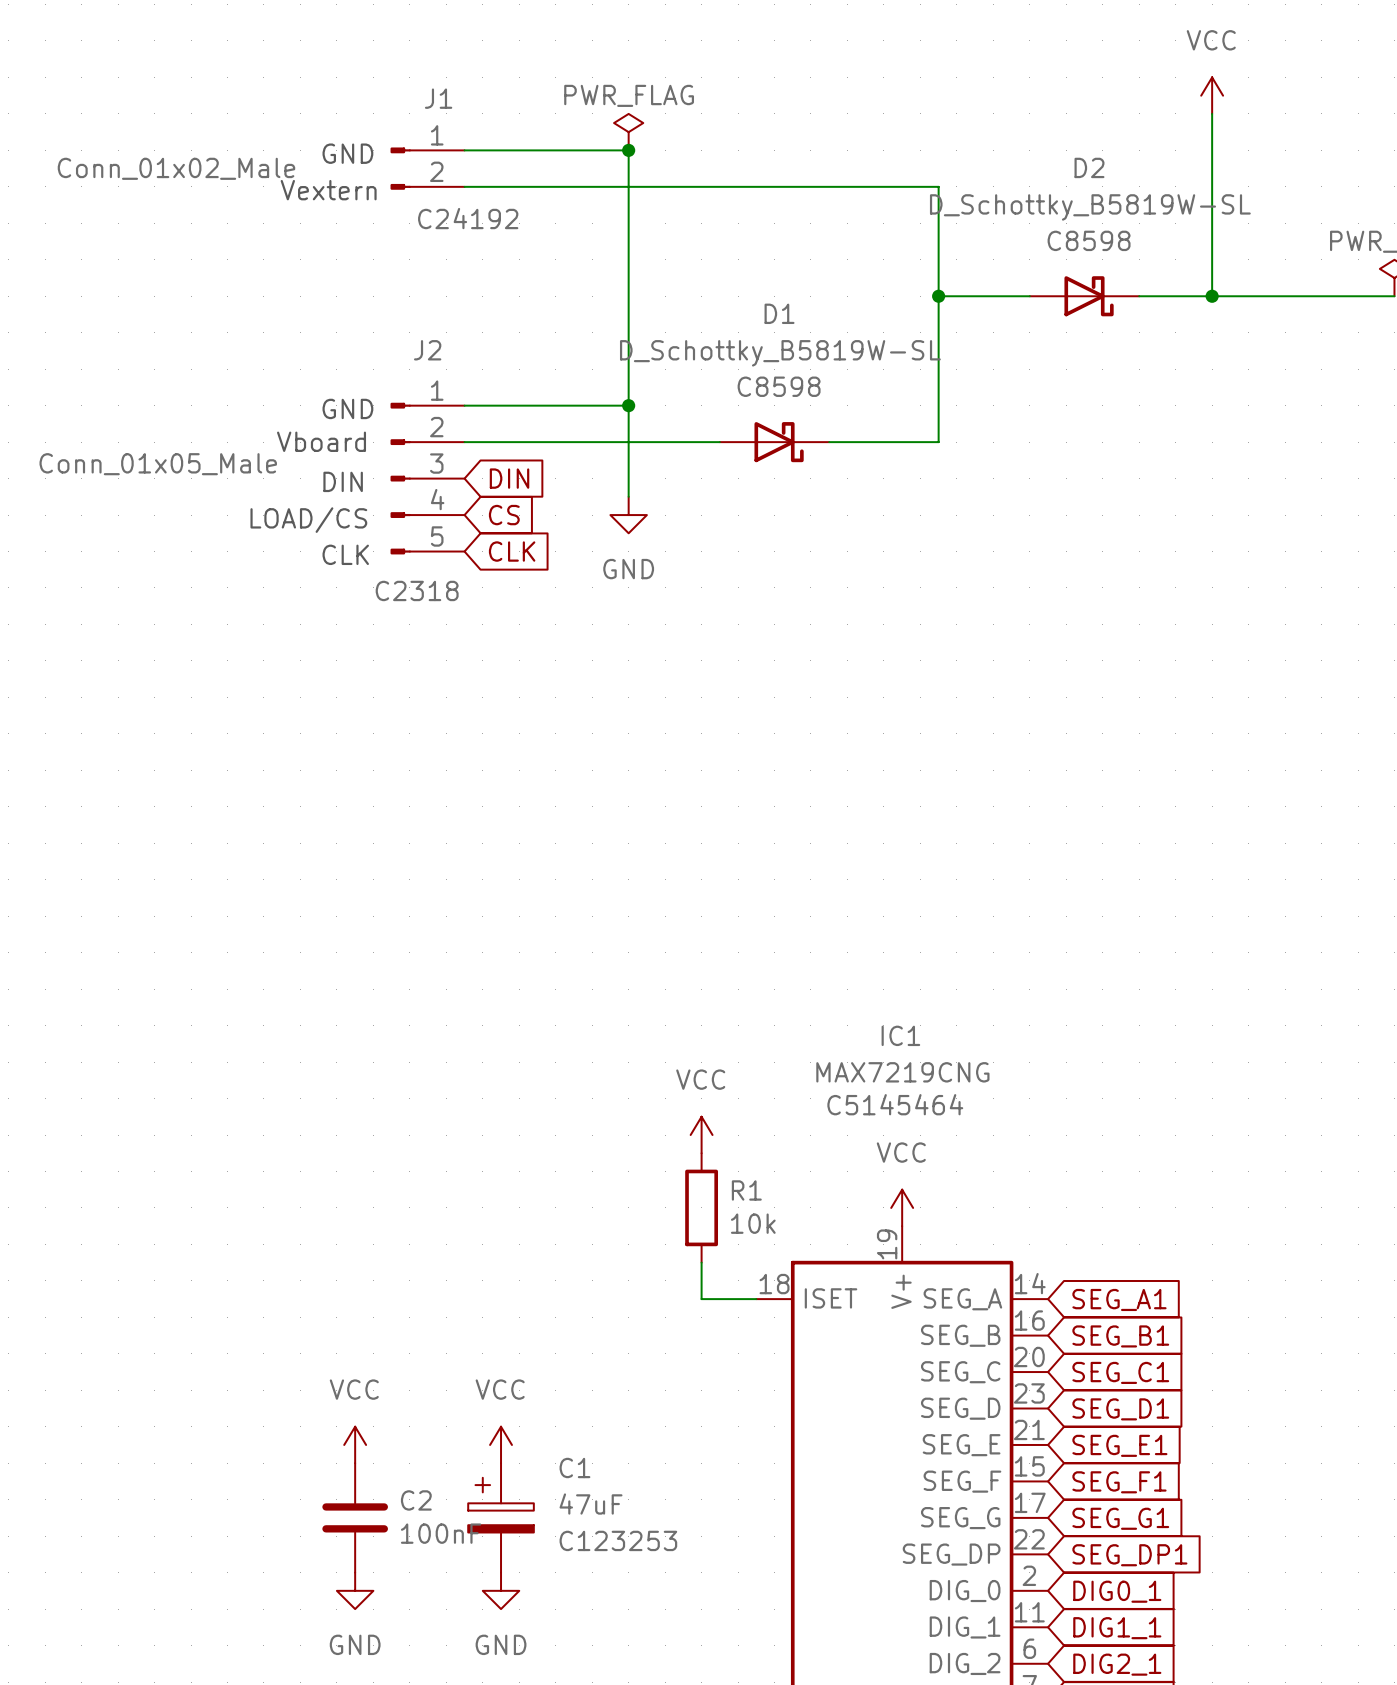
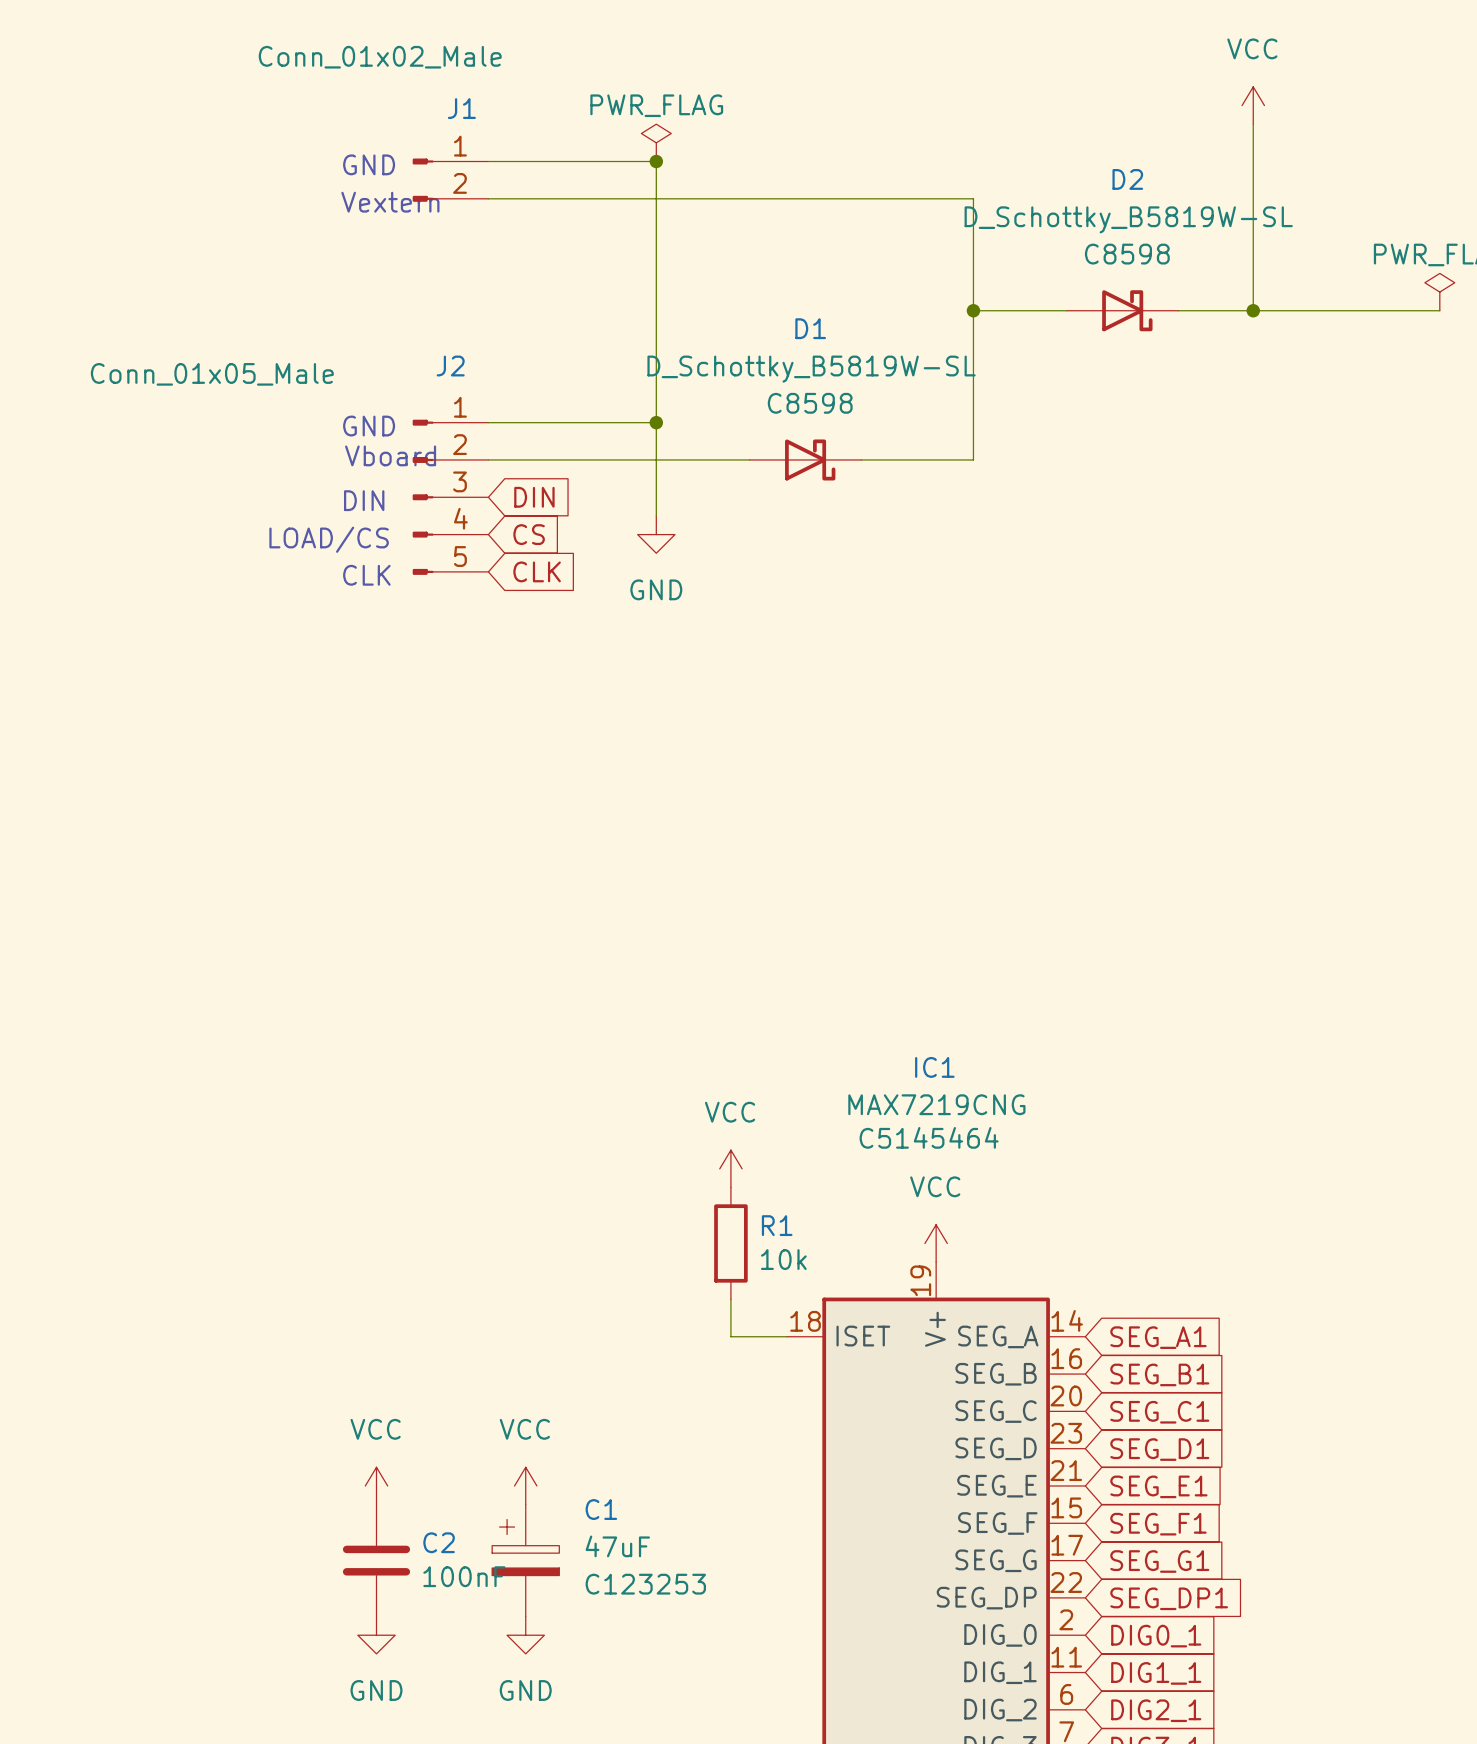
J1 value position: Conn_01x02_Male (176, 168) -> Conn_01x02_Male (380, 57)
text position: Vextern (328, 190) -> Vextern (390, 202)
J1 text: C24192 (468, 218) -> none
text position: Vboard (321, 441) -> Vboard (390, 455)
J2 value position: Conn_01x05_Male (158, 464) -> Conn_01x05_Male (212, 374)
J2 text: C2318 (417, 590) -> none

